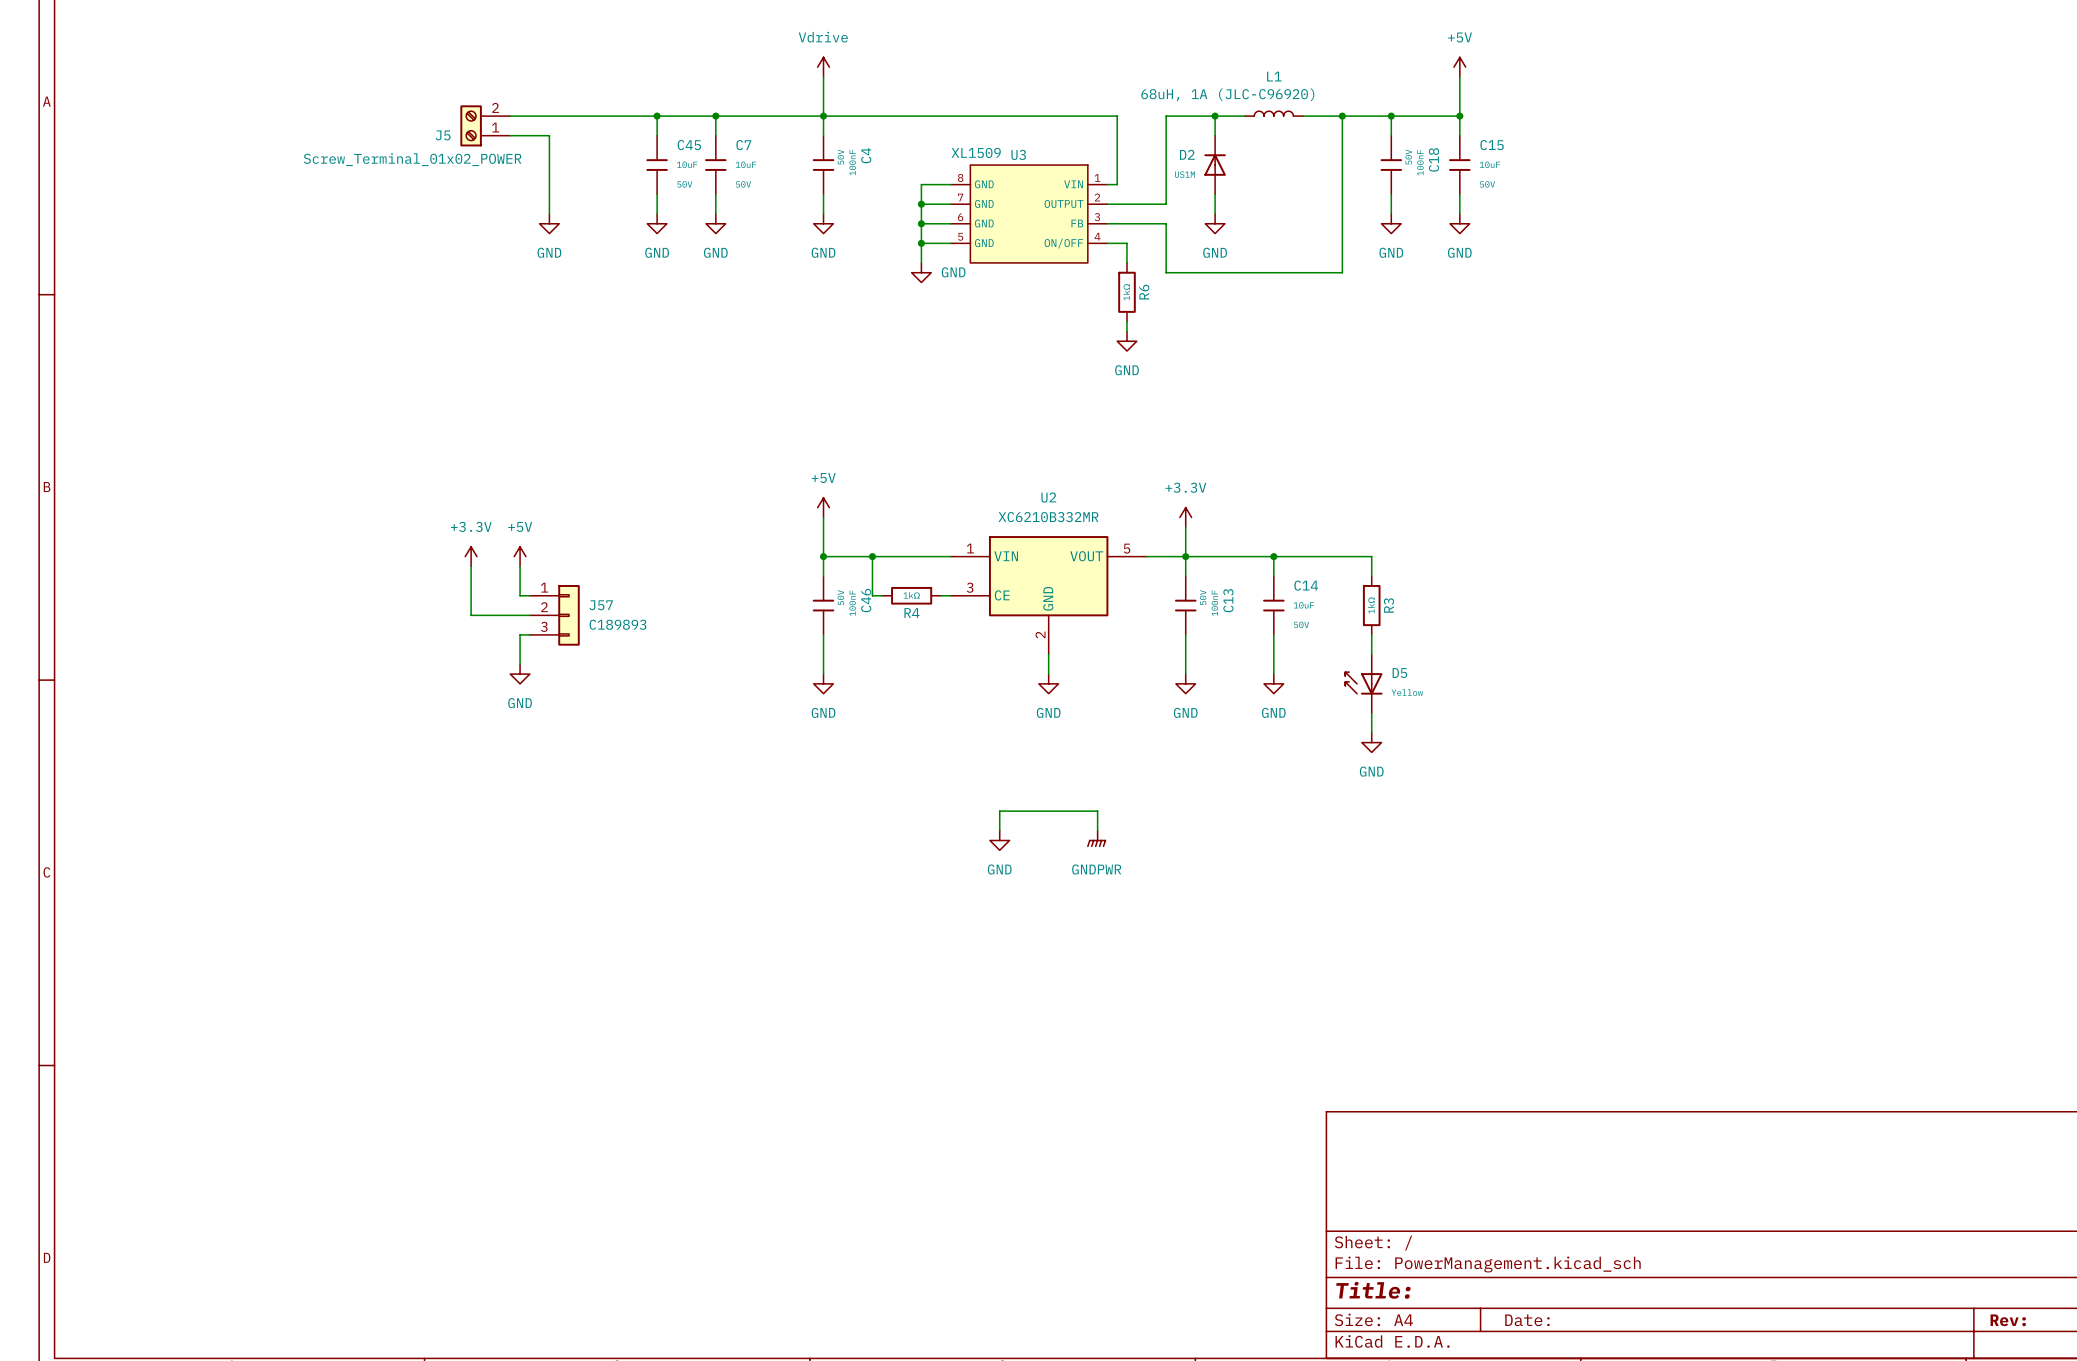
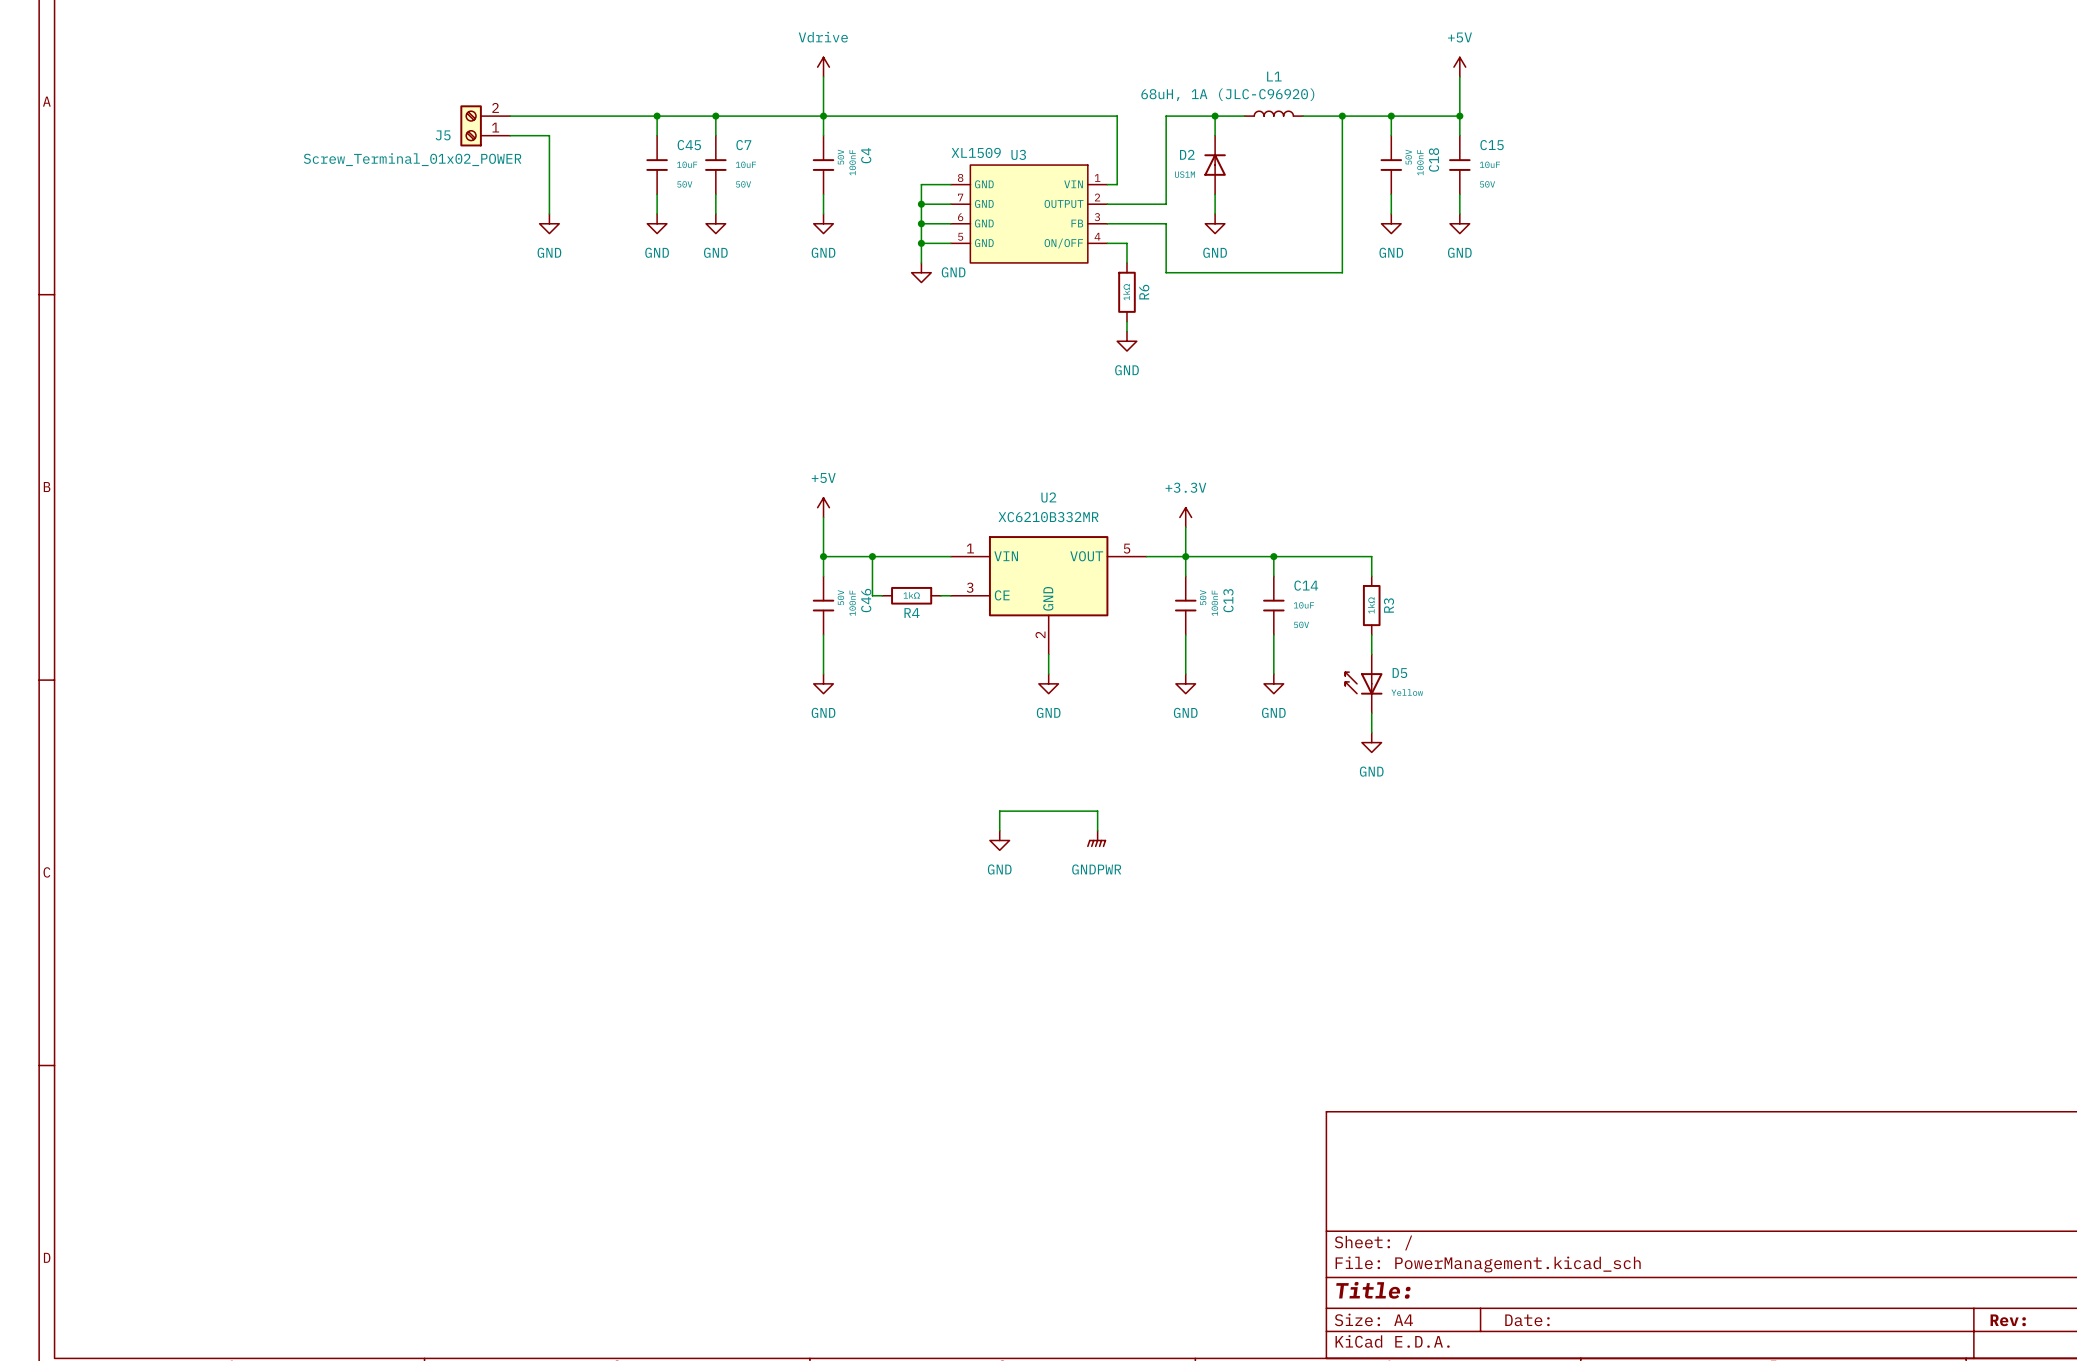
power symbol: +3.3V (471, 556) -> none
power symbol: +5V (520, 556) -> none
wire: (471, 566) (471, 615) (529, 615) -> none
wire: (520, 566) (520, 595) (529, 595) -> none
J57: C189893 (554, 615) -> none
wire: (529, 634) (520, 634) (520, 664) -> none
power symbol: GND (520, 674) -> none

